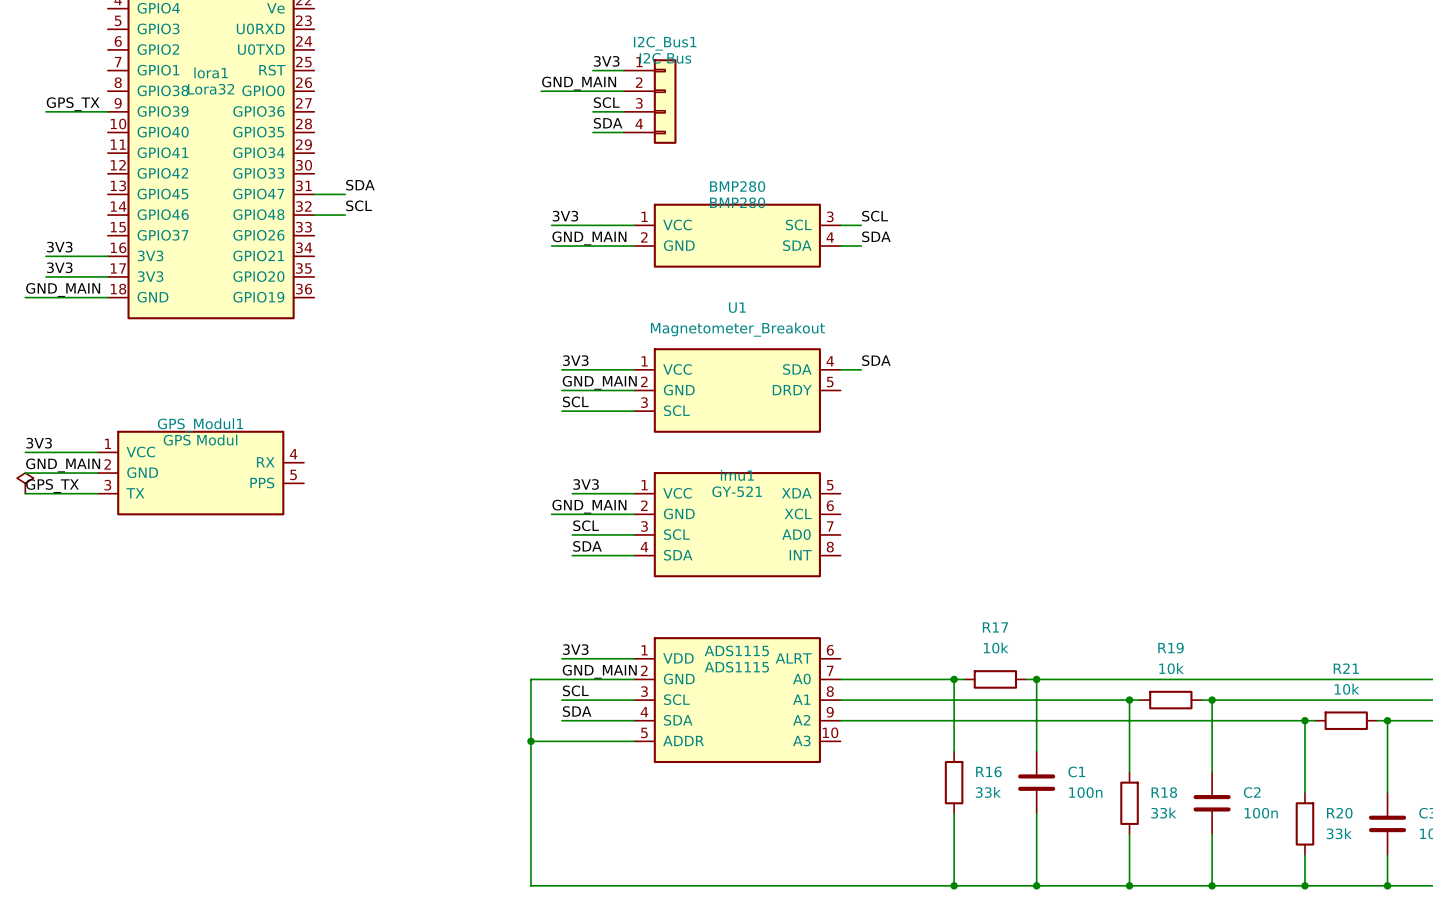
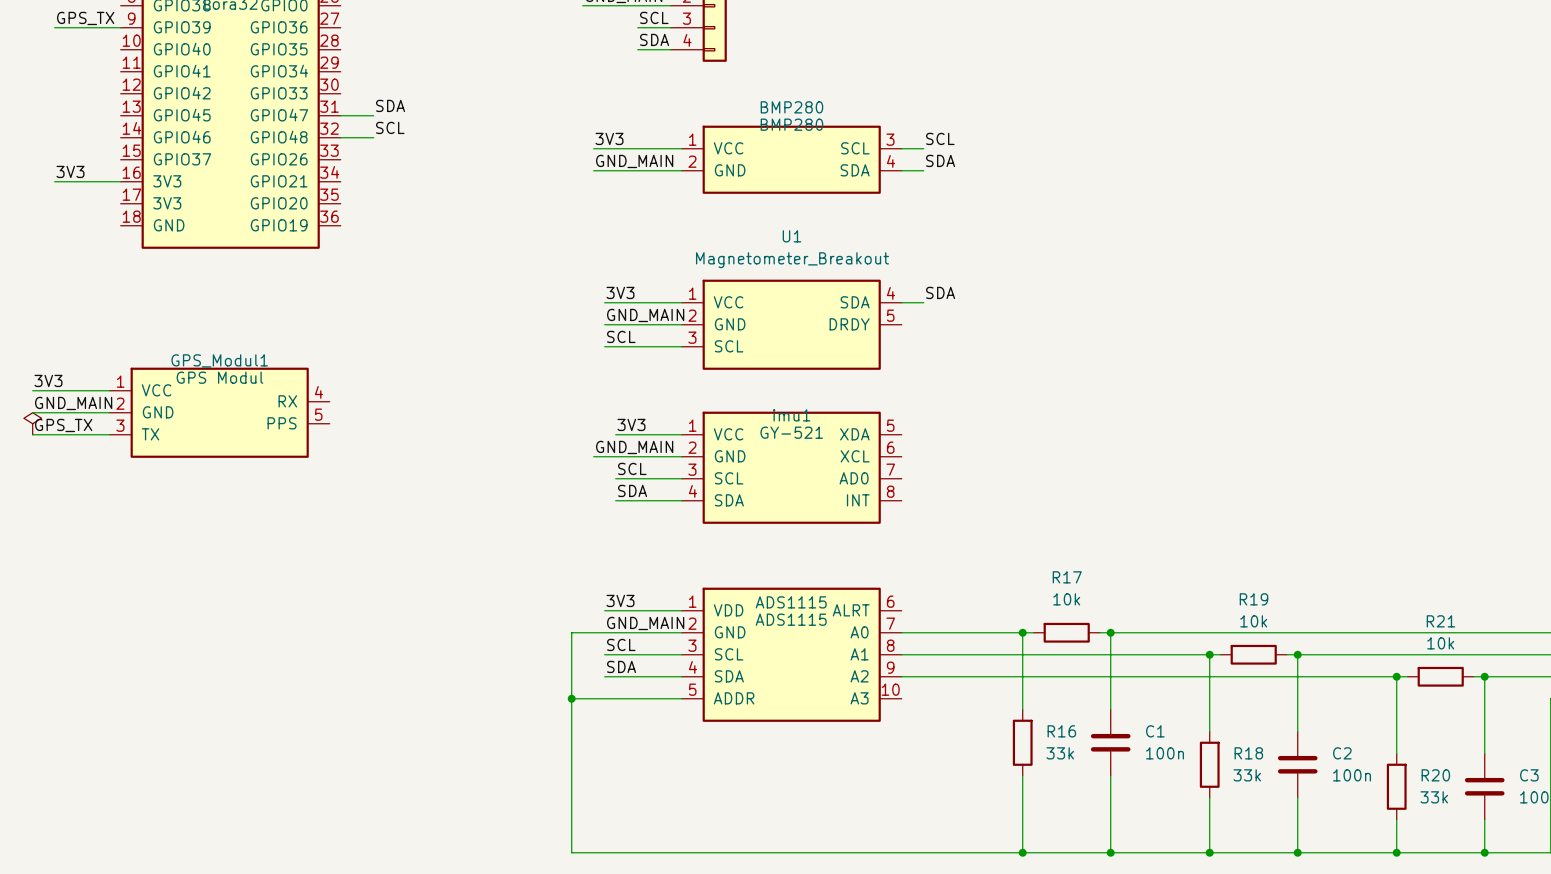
label: 3V3 (59, 267) -> none
wire: (45, 276) (107, 276) -> none
label: GND_MAIN (63, 289) -> none
wire: (25, 297) (107, 297) -> none

